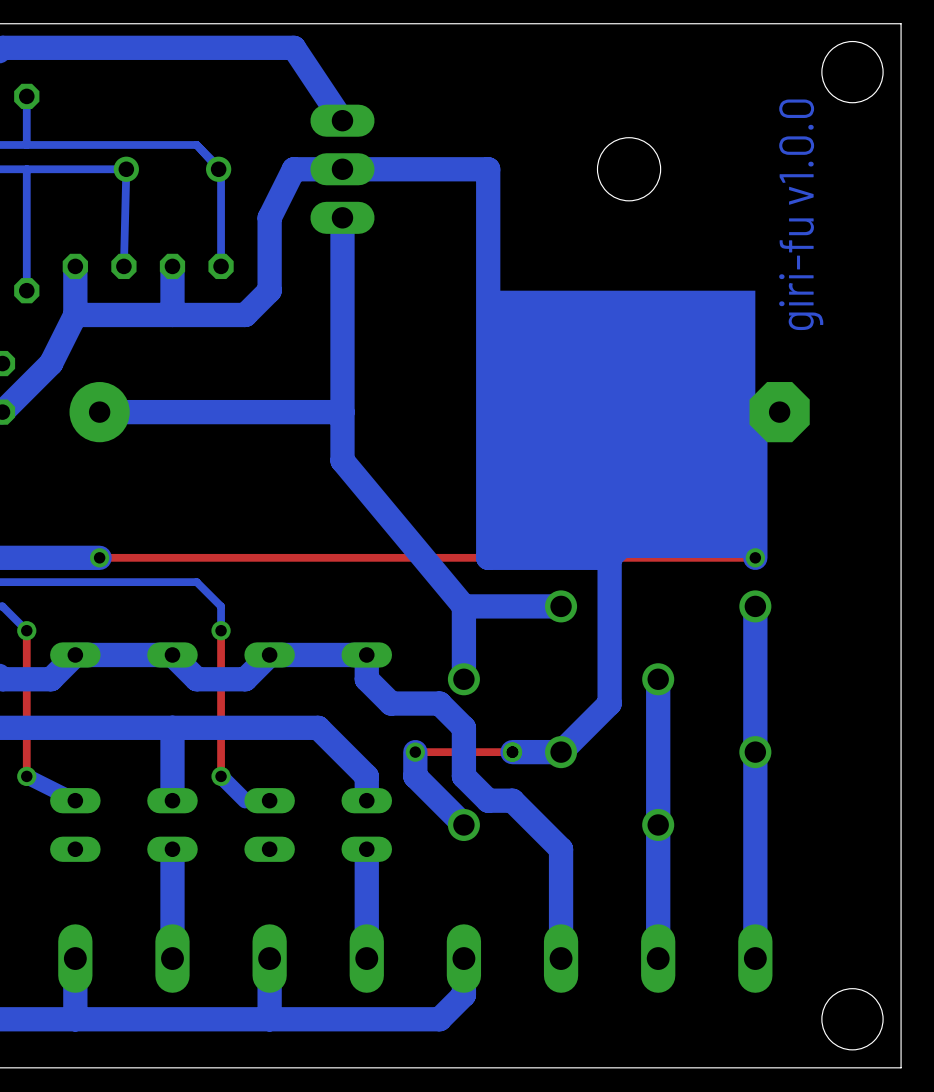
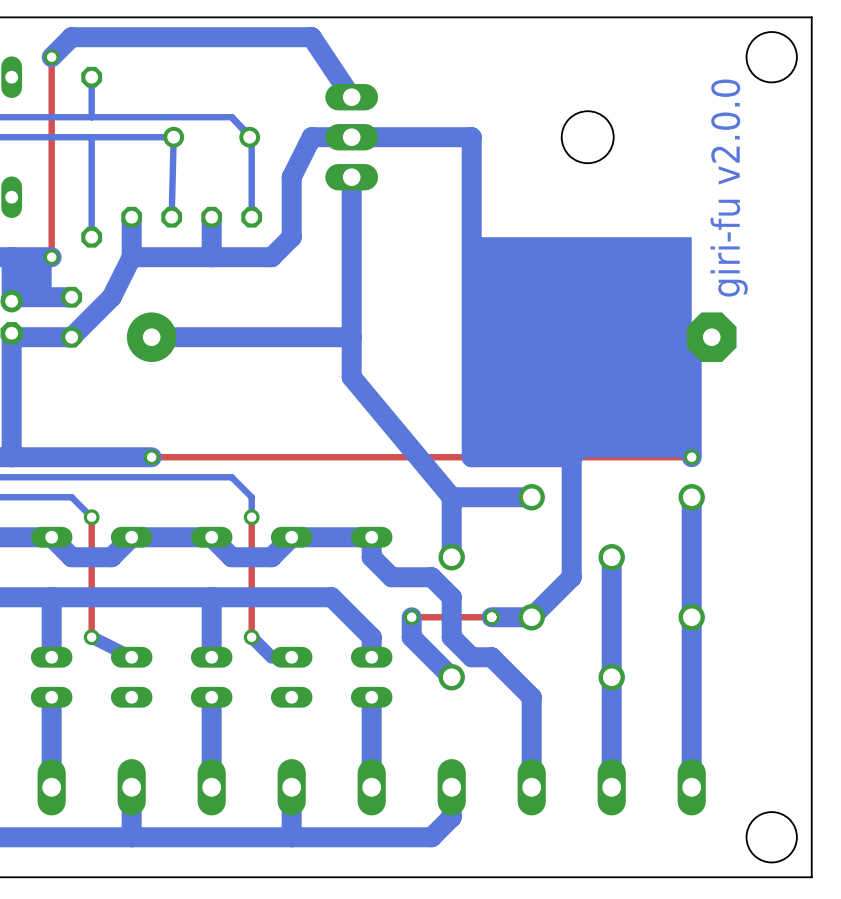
text: giri-fu v1.0.0 (801, 214) -> giri-fu v2.0.0 (729, 188)

